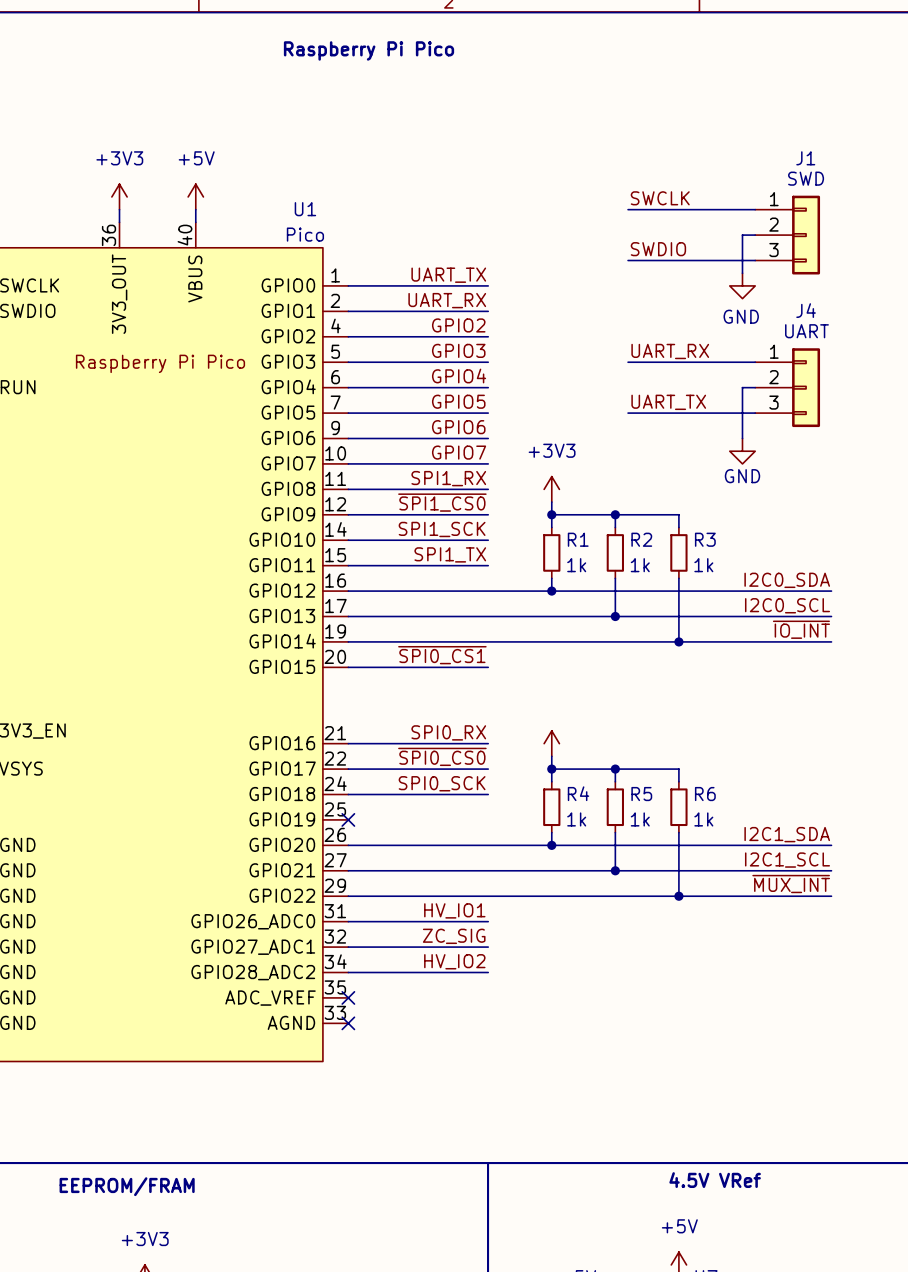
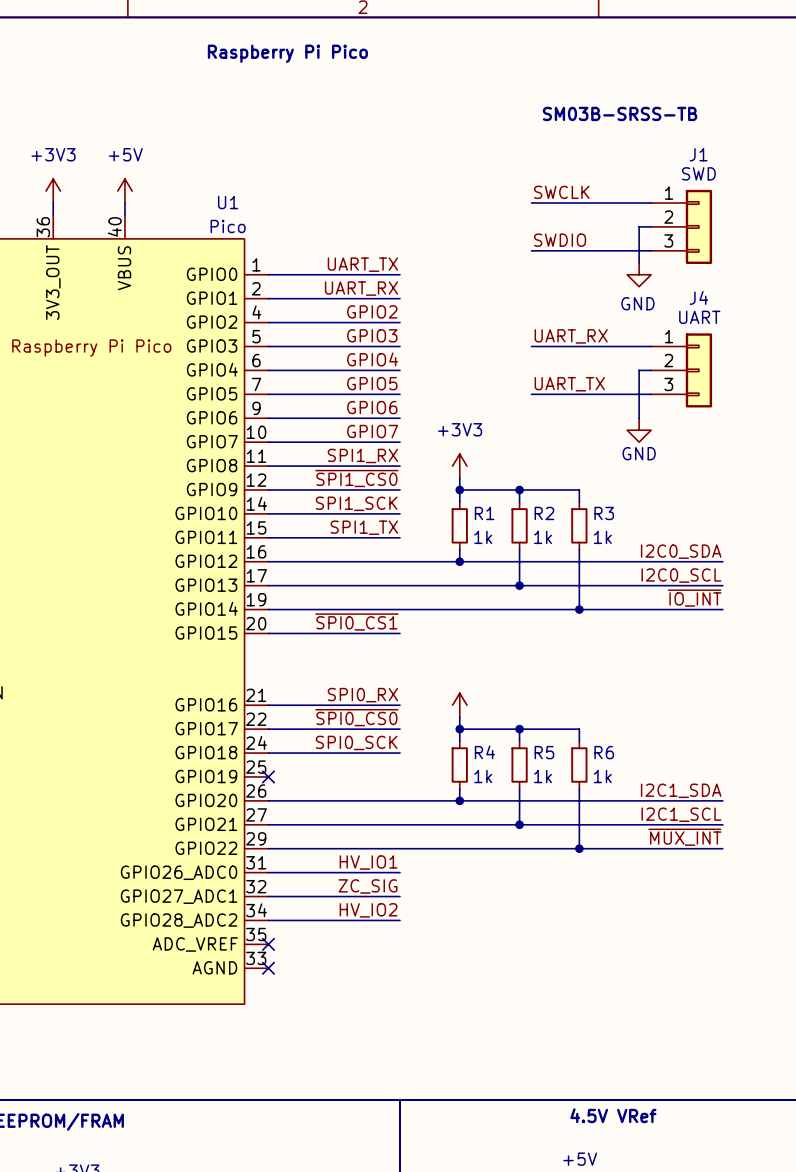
text: none -> SM03B-SRSS-TB (620, 113)

